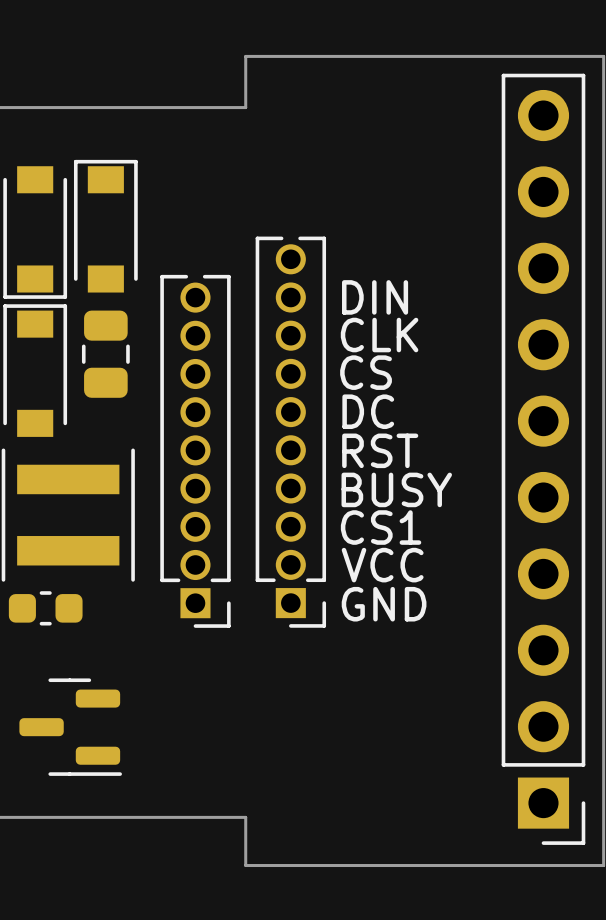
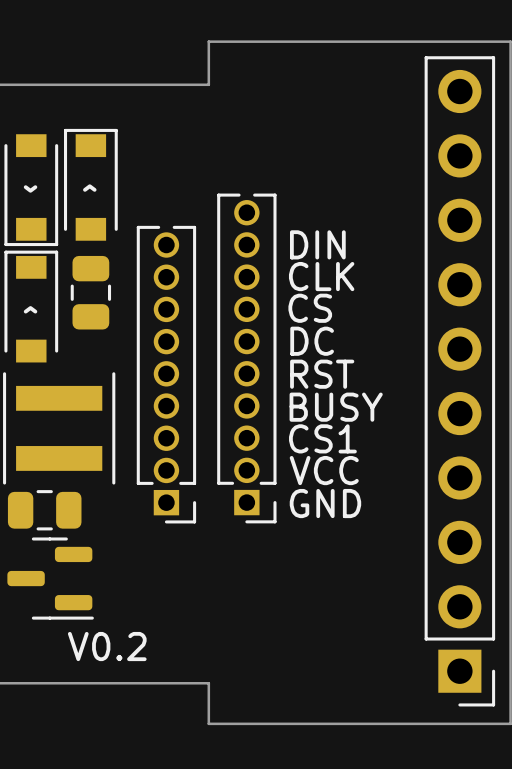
text: none -> ^ (89, 188)
text: none -> ^ (30, 188)
text: none -> ^ (30, 309)
part footprint: [8, 591, 83, 626] -> [7, 490, 82, 531]
part position: (70, 727) -> (50, 578)
text: none -> V0.2 (107, 646)

